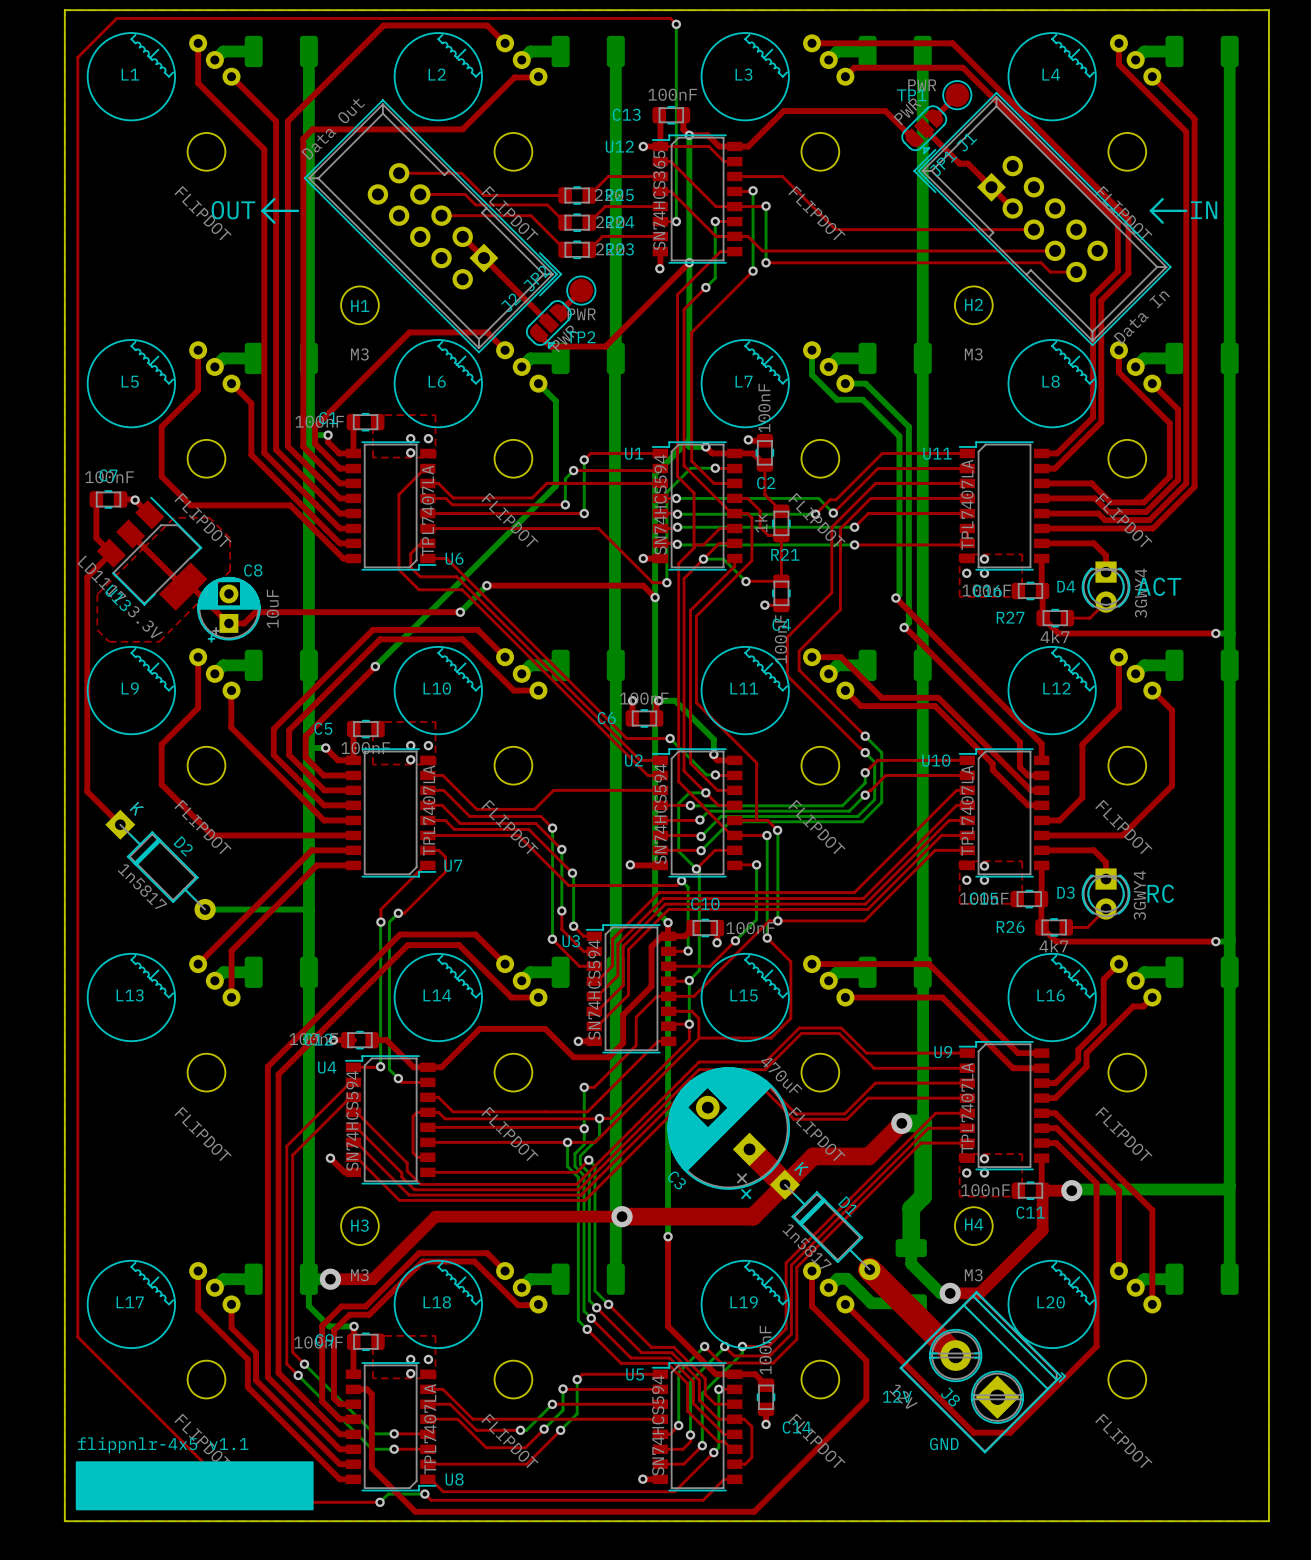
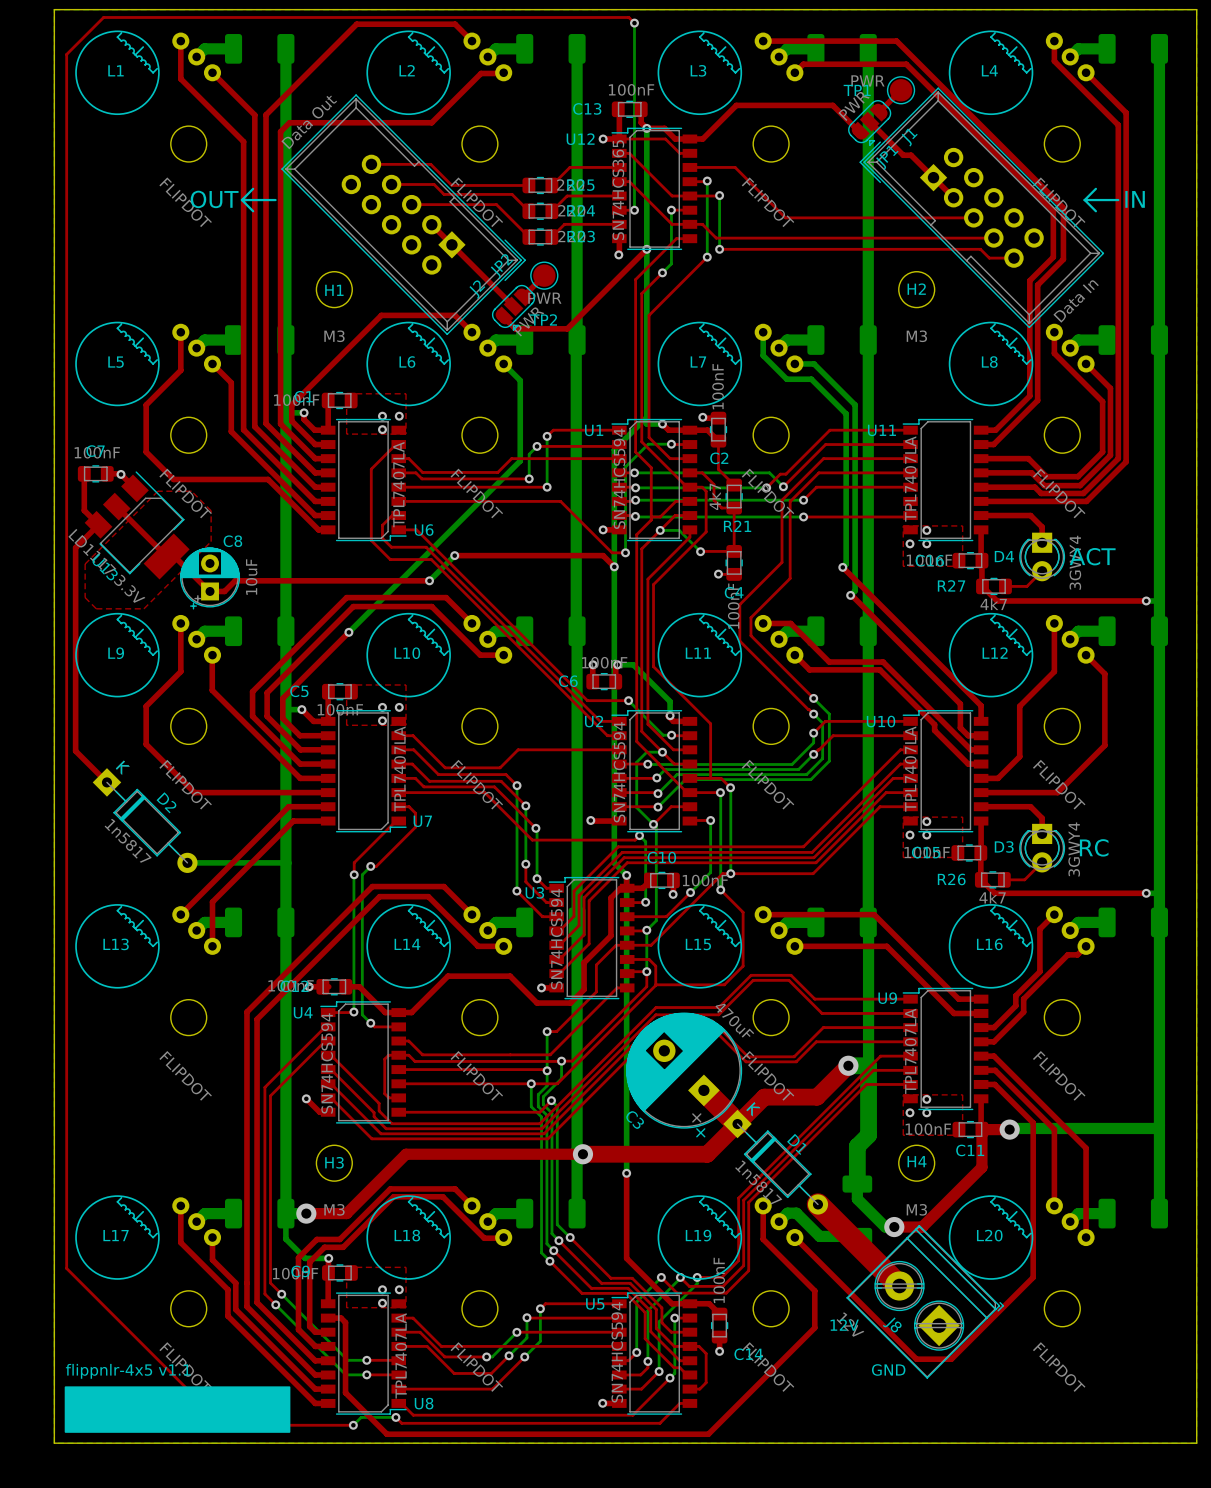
R21 value: 1k (761, 523) -> 4k7 (715, 496)

